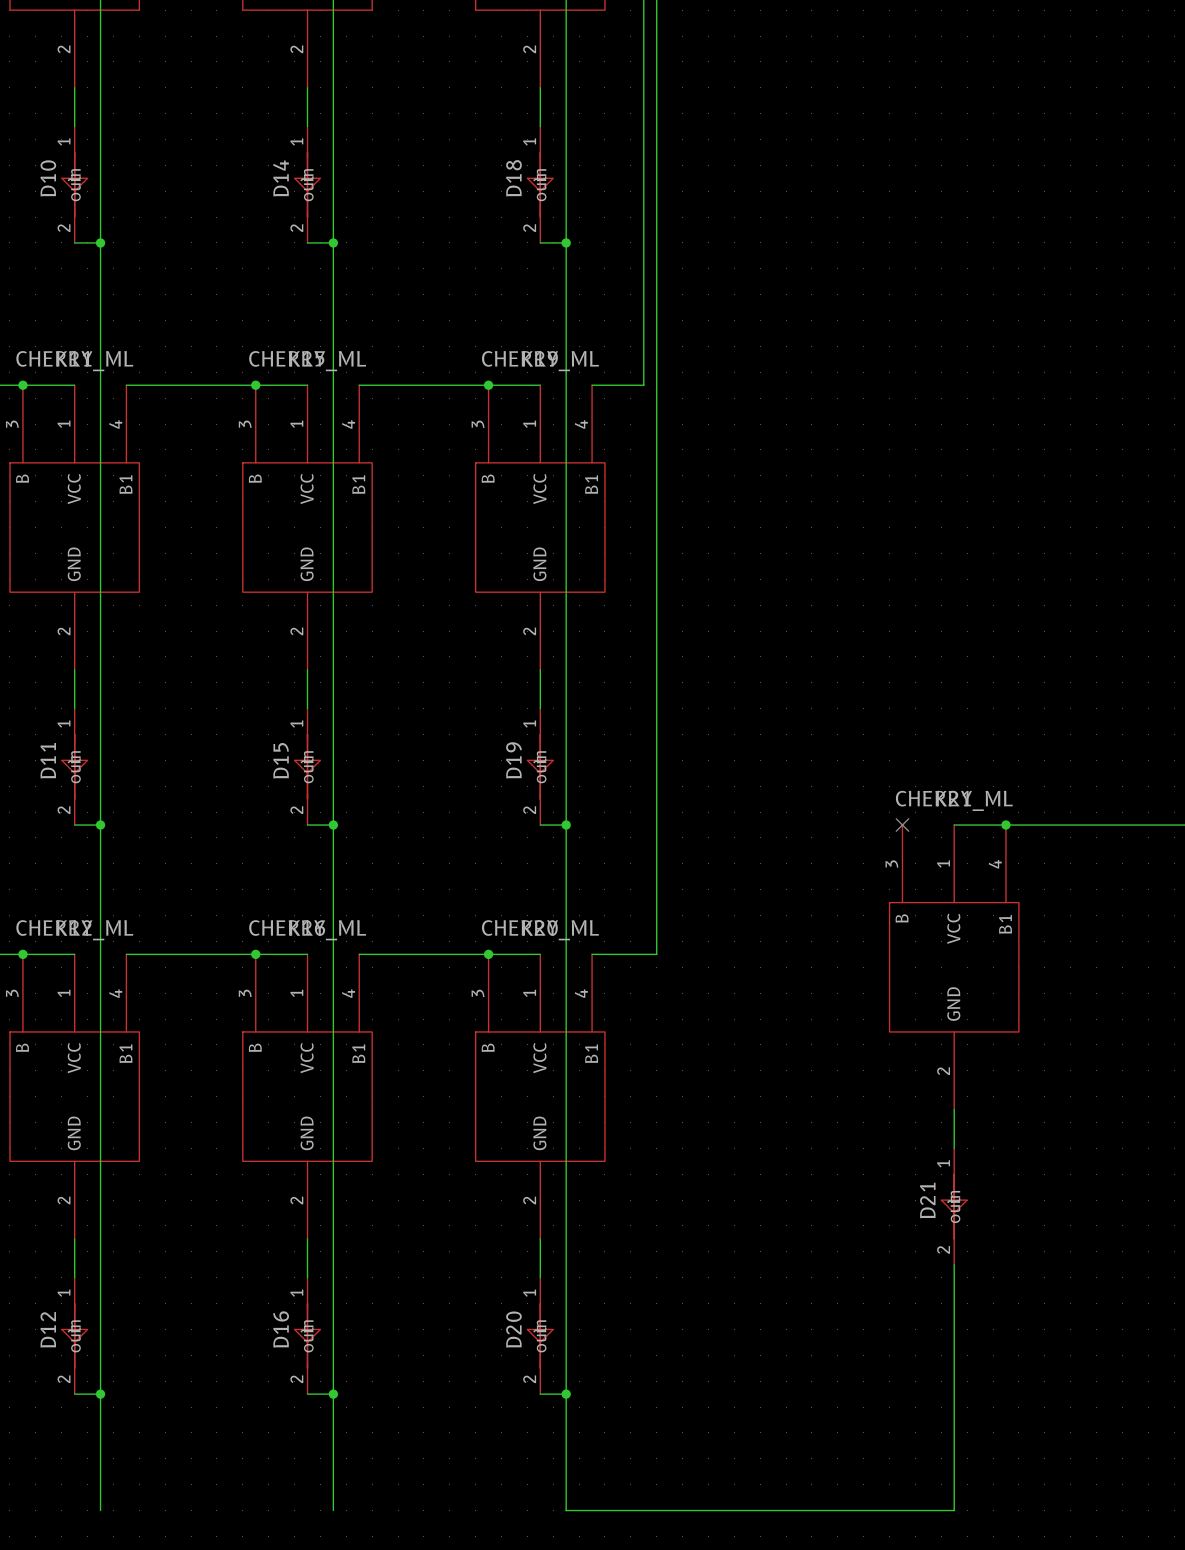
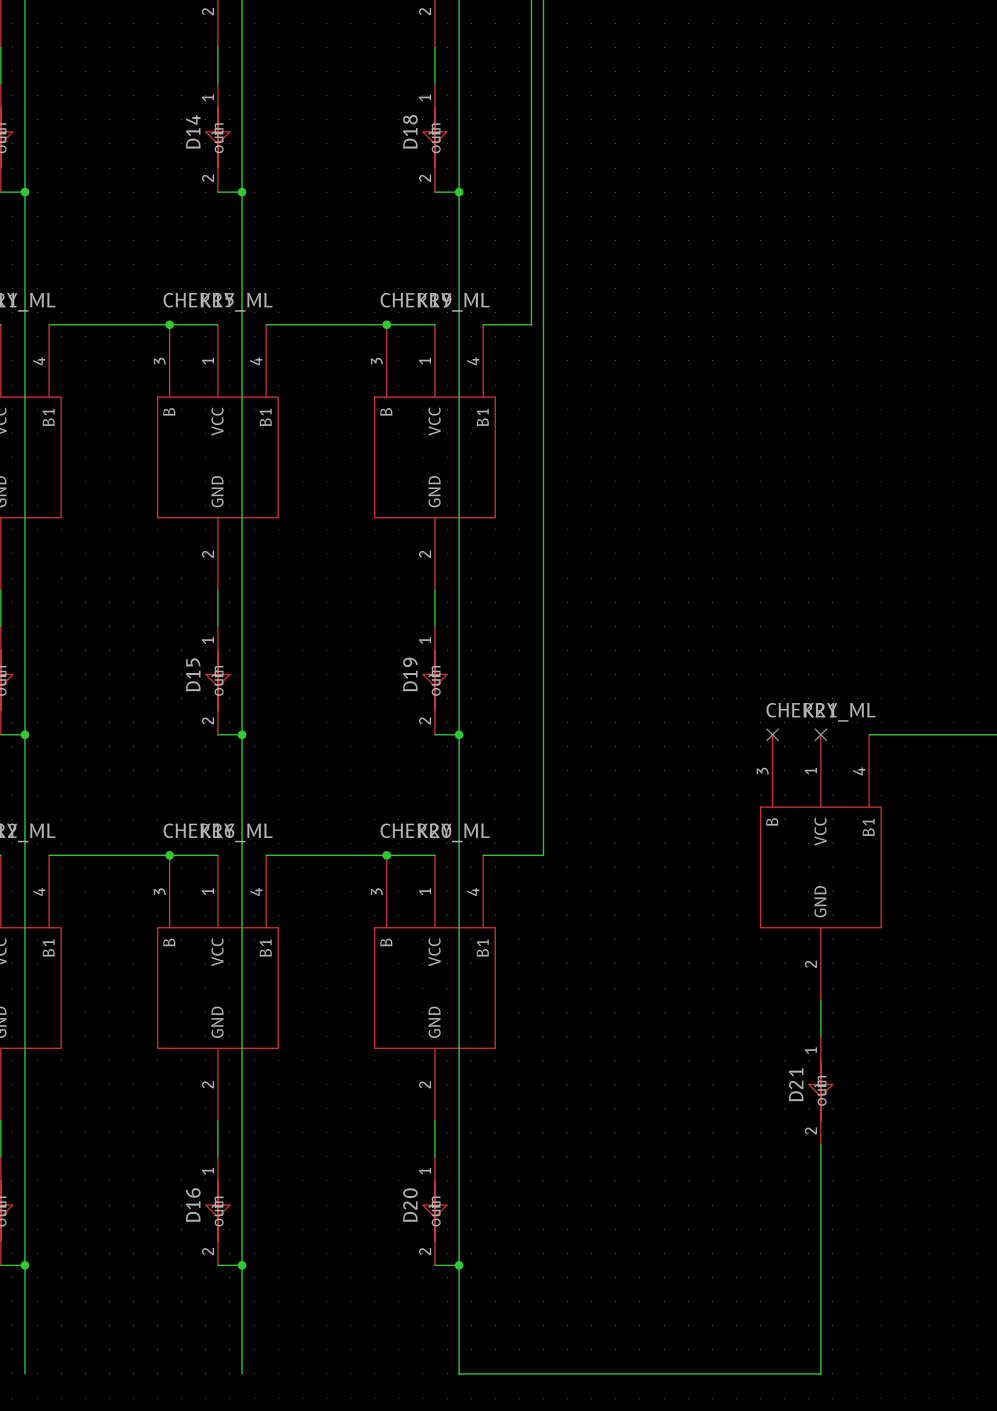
wire: (954, 825) (1005, 825) -> none
no-connect mark: none -> (820, 734)
junction: (1005, 825) -> none

